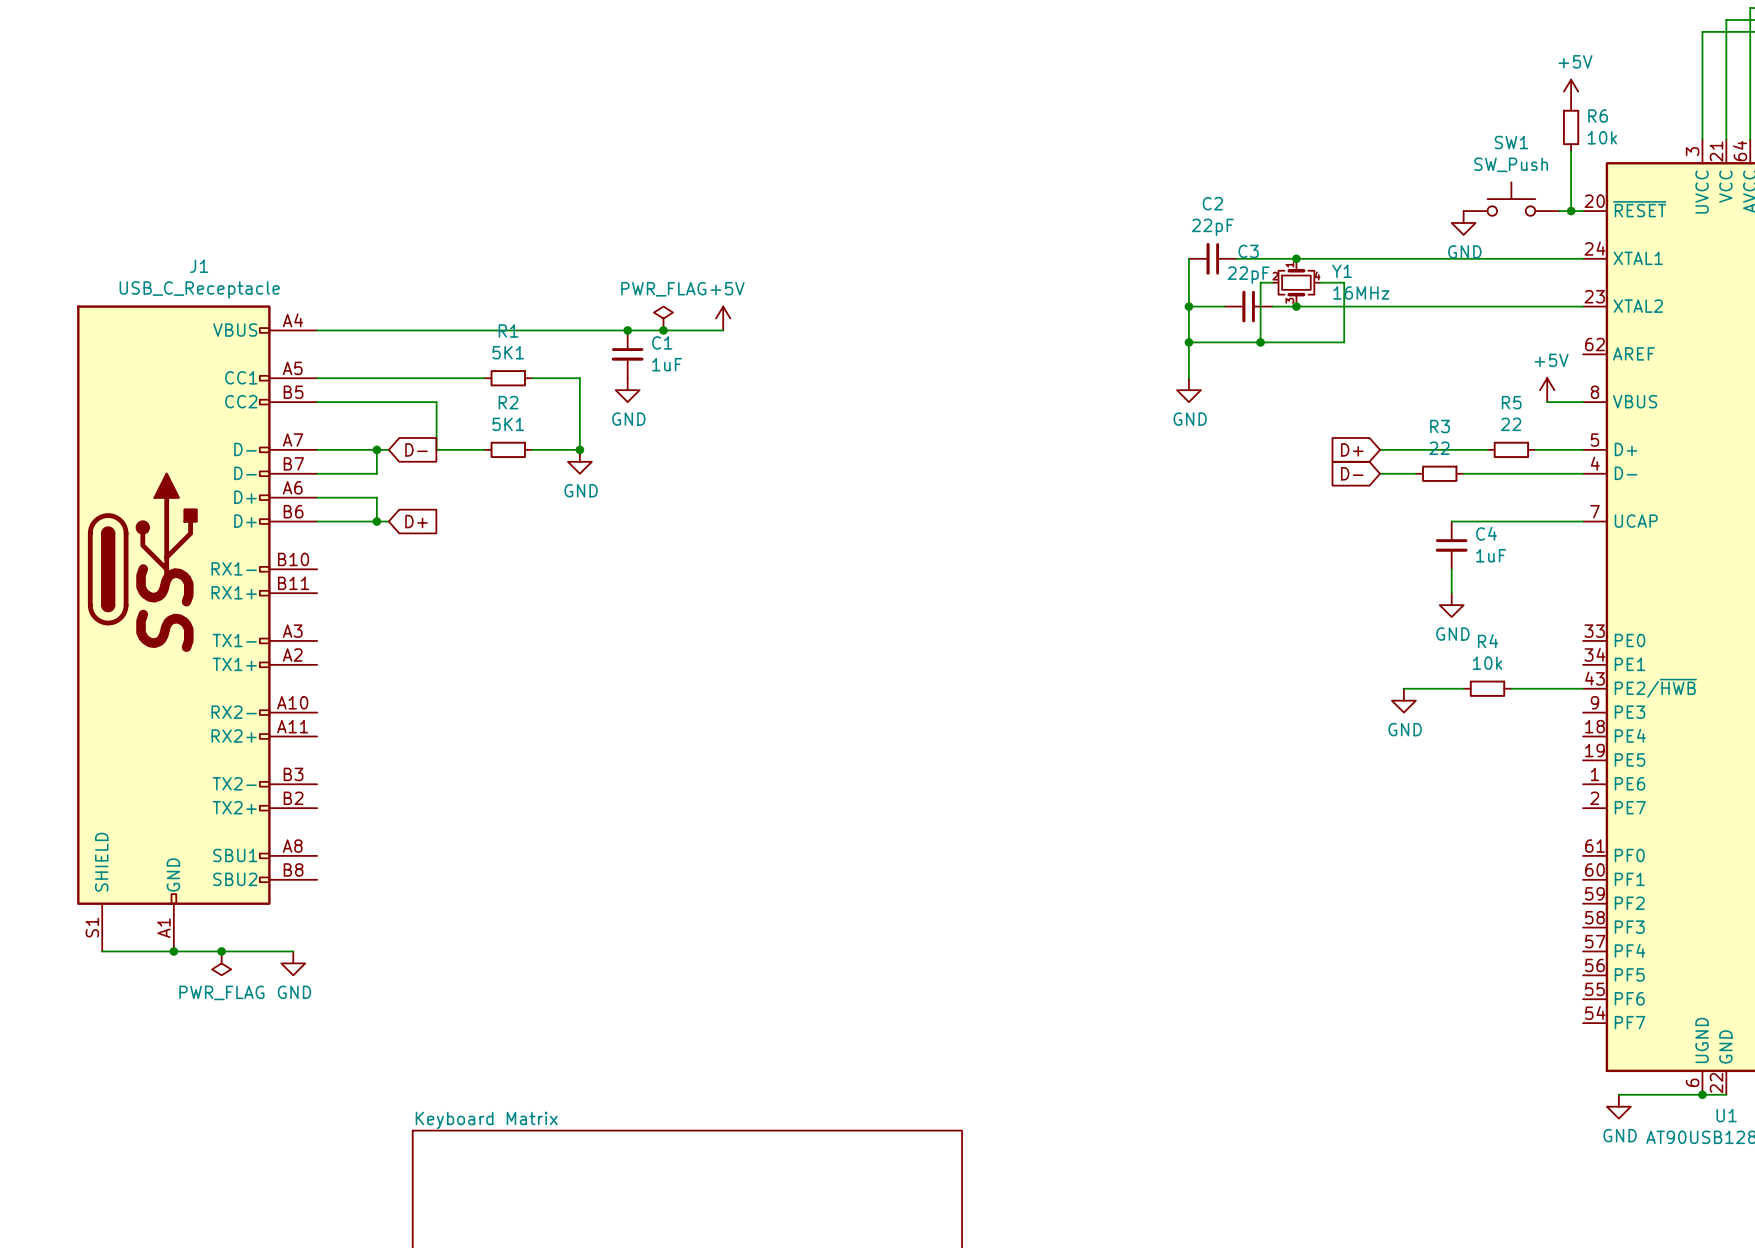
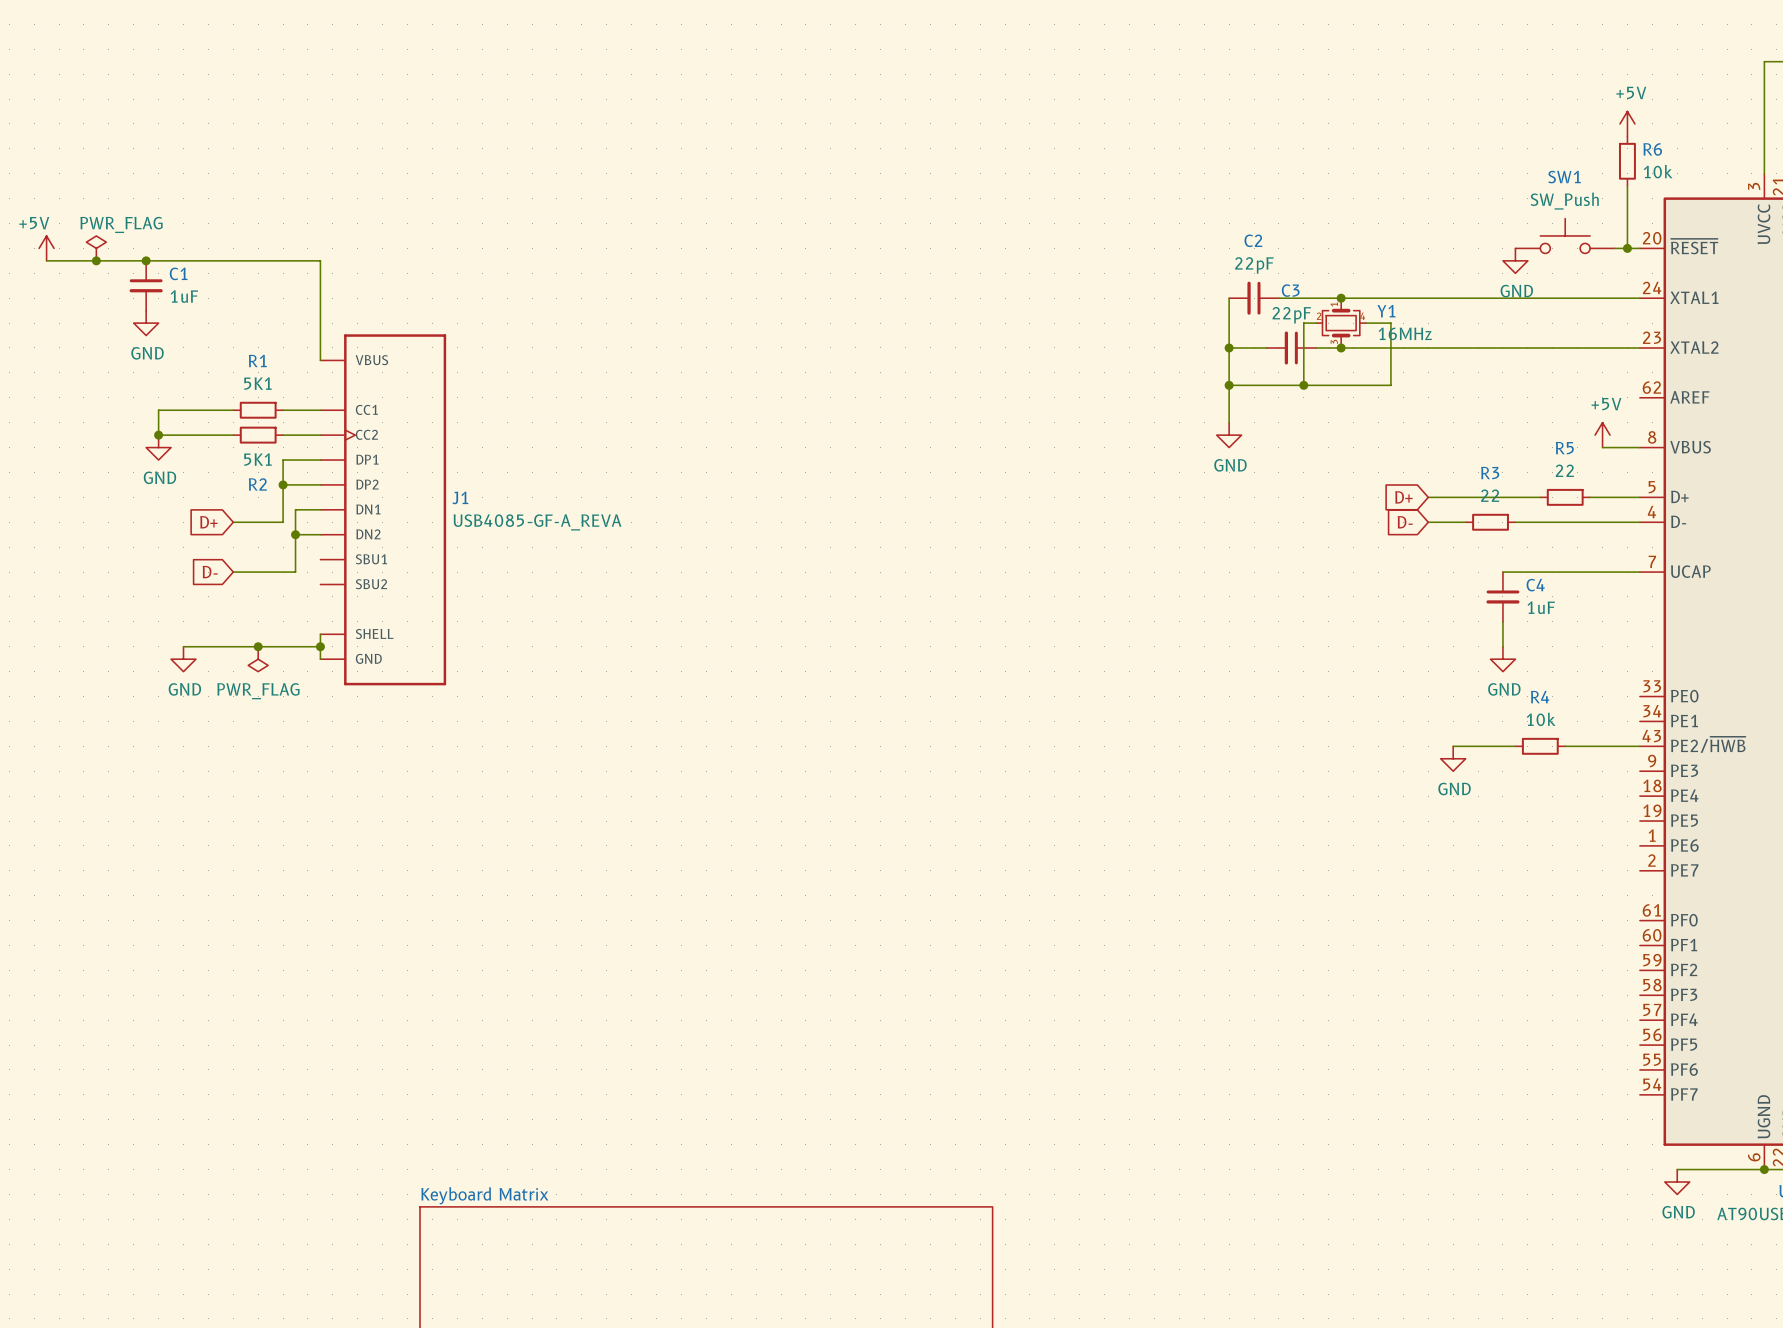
power symbol: none -> +5V (46, 248)
power symbol: none -> PWR_FLAG (96, 248)
wire: none -> (46, 260) (320, 260) (320, 360)
junction: none -> (96, 260)
junction: none -> (146, 260)
J1 name position: J1 (199, 266) -> J1 (460, 497)
power symbol: none -> GND (146, 323)
J1 value: USB_C_Receptacle (199, 289) -> USB4085-GF-A_REVA (537, 522)
J1 symbol: [77, 305, 318, 952] -> [320, 334, 447, 686]
power symbol: PWR_FLAG (663, 318) -> none
power symbol: +5V (723, 318) -> none
wire: (317, 330) (723, 330) -> none
junction: (627, 330) -> none
junction: (663, 330) -> none
C1 position: (627, 354) -> (146, 285)
wire: none -> (283, 410) (320, 410)
wire: (317, 378) (484, 378) -> none
R1 position: (508, 378) -> (258, 410)
wire: (532, 378) (579, 378) (579, 449) (532, 449) -> none
junction: none -> (158, 435)
wire: none -> (283, 435) (320, 435)
power symbol: GND (627, 390) -> none
power symbol: none -> GND (158, 447)
wire: (317, 402) (436, 402) (436, 449) (484, 449) -> none
R2 name position: R2 (508, 402) -> R2 (257, 484)
wire: none -> (320, 460) (283, 460) (283, 522) (233, 522)
R2 value position: 5K1 (508, 424) -> 5K1 (257, 459)
wire: none -> (283, 484) (320, 484)
junction: none -> (283, 484)
wire: (317, 449) (388, 449) -> none
wire: (376, 449) (376, 473) (317, 473) -> none
junction: (376, 449) -> none
global label rotation: 0° (416, 449) -> 180° (210, 572)
global label position: D- (416, 449) -> D- (210, 572)
R2 position: (508, 449) -> (258, 435)
junction: (579, 449) -> none
wire: none -> (320, 509) (295, 509) (295, 572) (233, 572)
power symbol: GND (579, 461) -> none
wire: none -> (295, 534) (320, 534)
junction: none -> (295, 534)
wire: (317, 497) (376, 497) (376, 521) -> none
wire: (317, 521) (388, 521) -> none
junction: (376, 521) -> none
global label rotation: 0° (416, 521) -> 180° (208, 522)
global label position: D+ (416, 521) -> D+ (208, 522)
wire: none -> (320, 634) (320, 659)
junction: none -> (258, 646)
junction: none -> (320, 646)
power symbol: none -> GND (183, 659)
power symbol: none -> PWR_FLAG (258, 659)
wire: (102, 951) (293, 951) -> none
junction: (173, 951) -> none
junction: (221, 951) -> none
power symbol: PWR_FLAG (221, 963) -> none
power symbol: GND (293, 963) -> none

